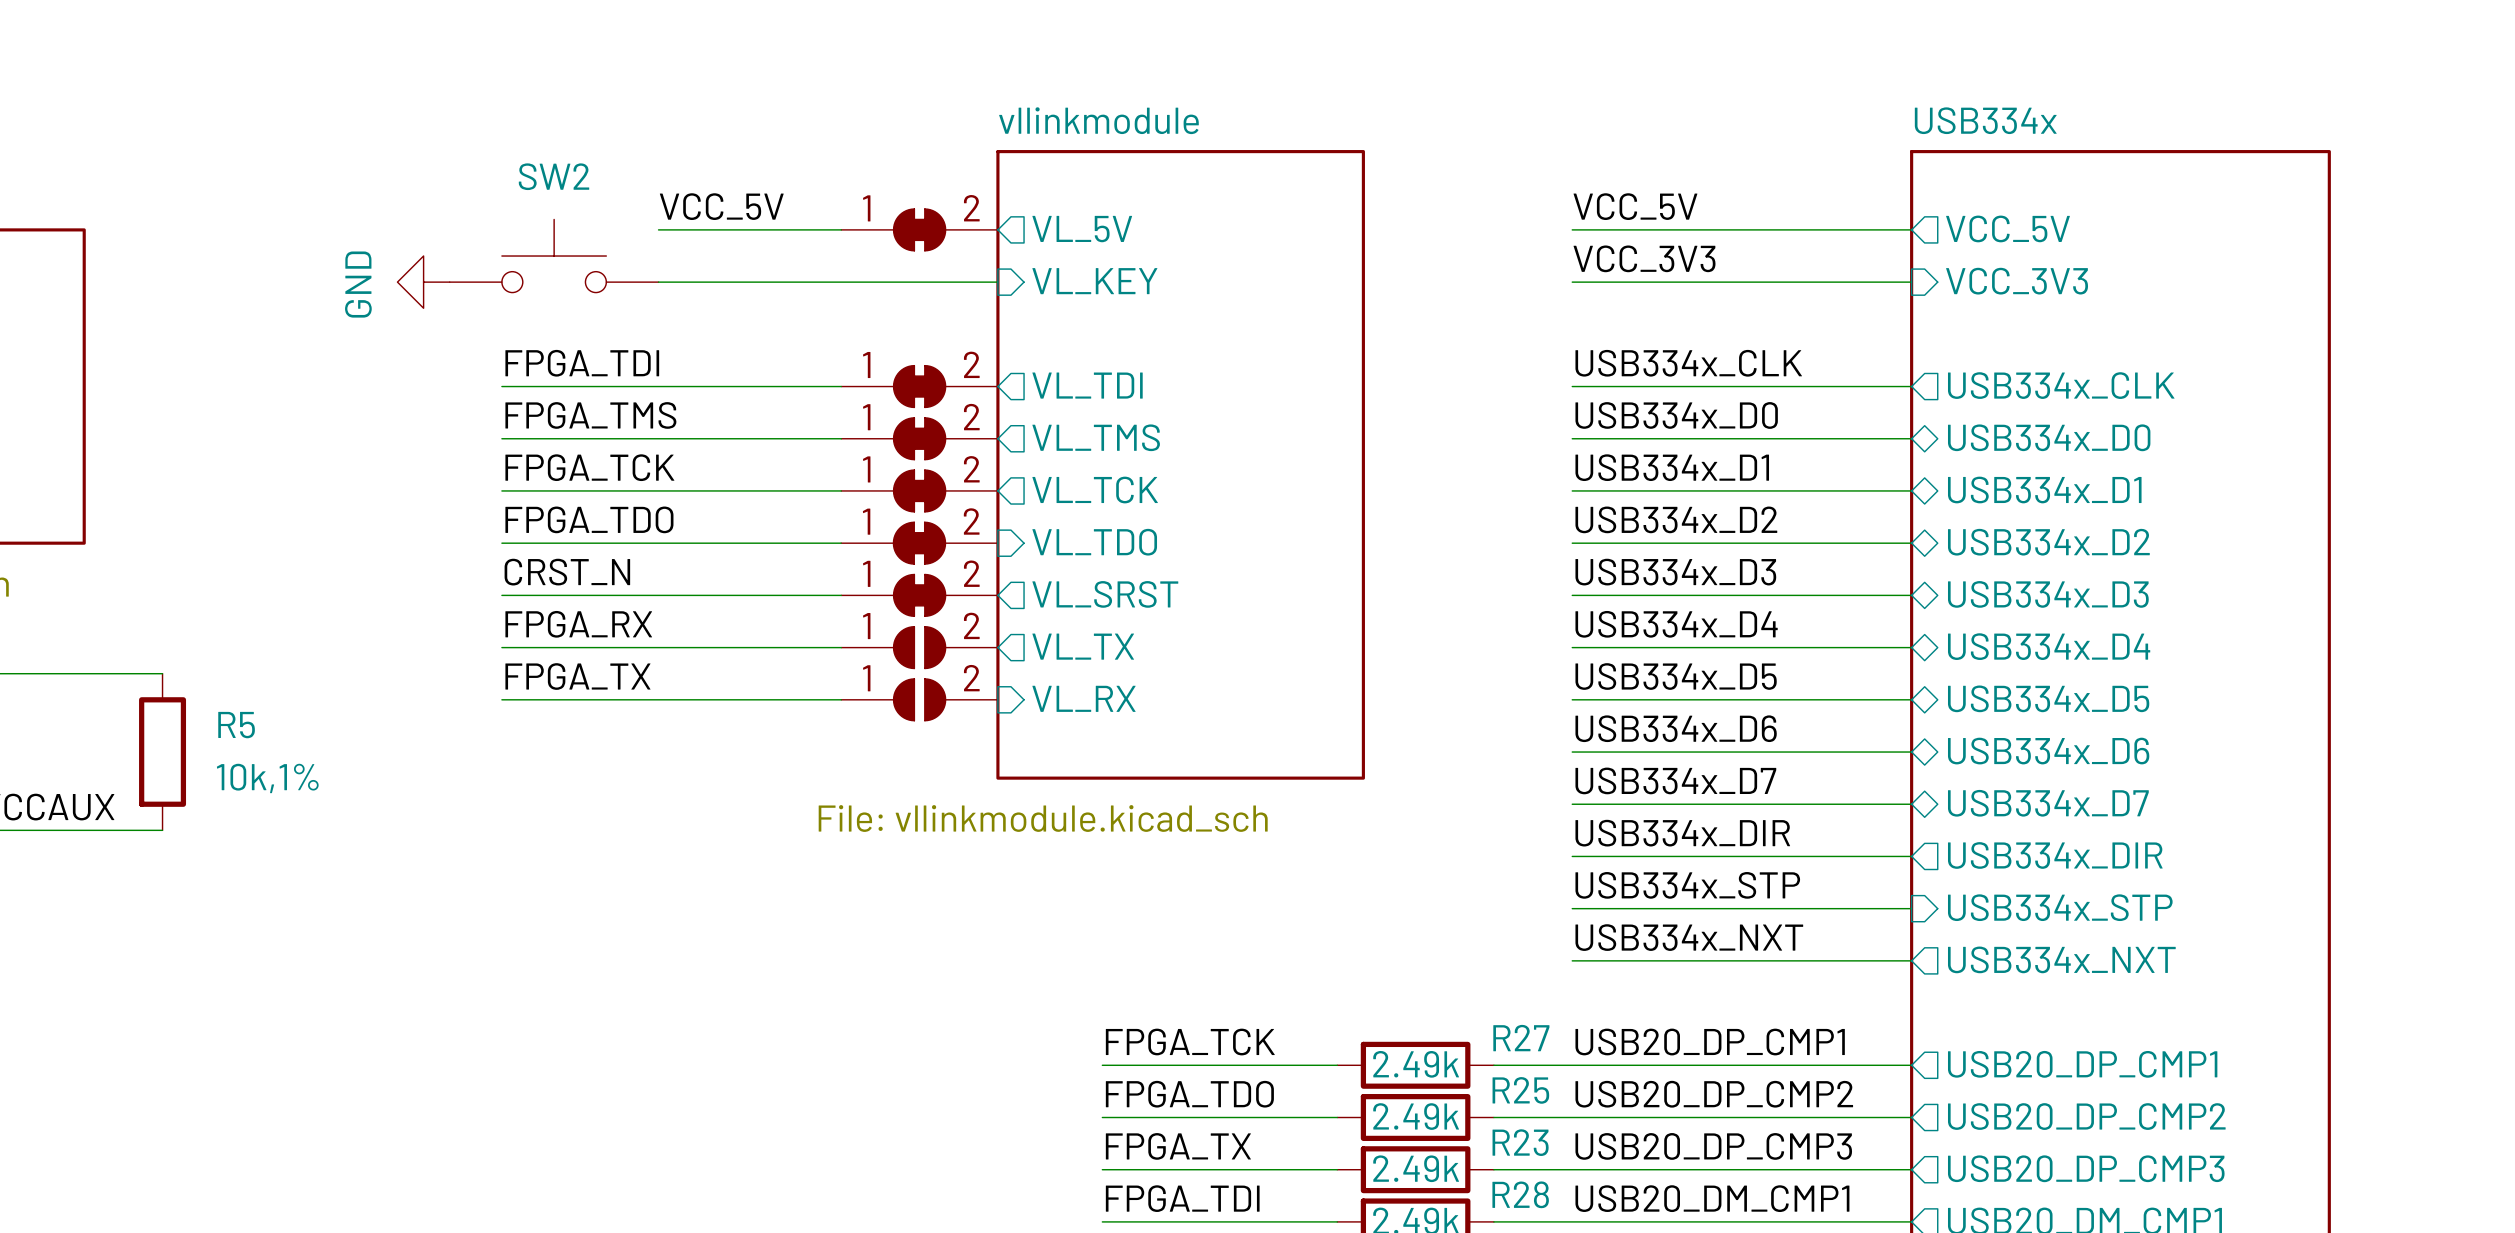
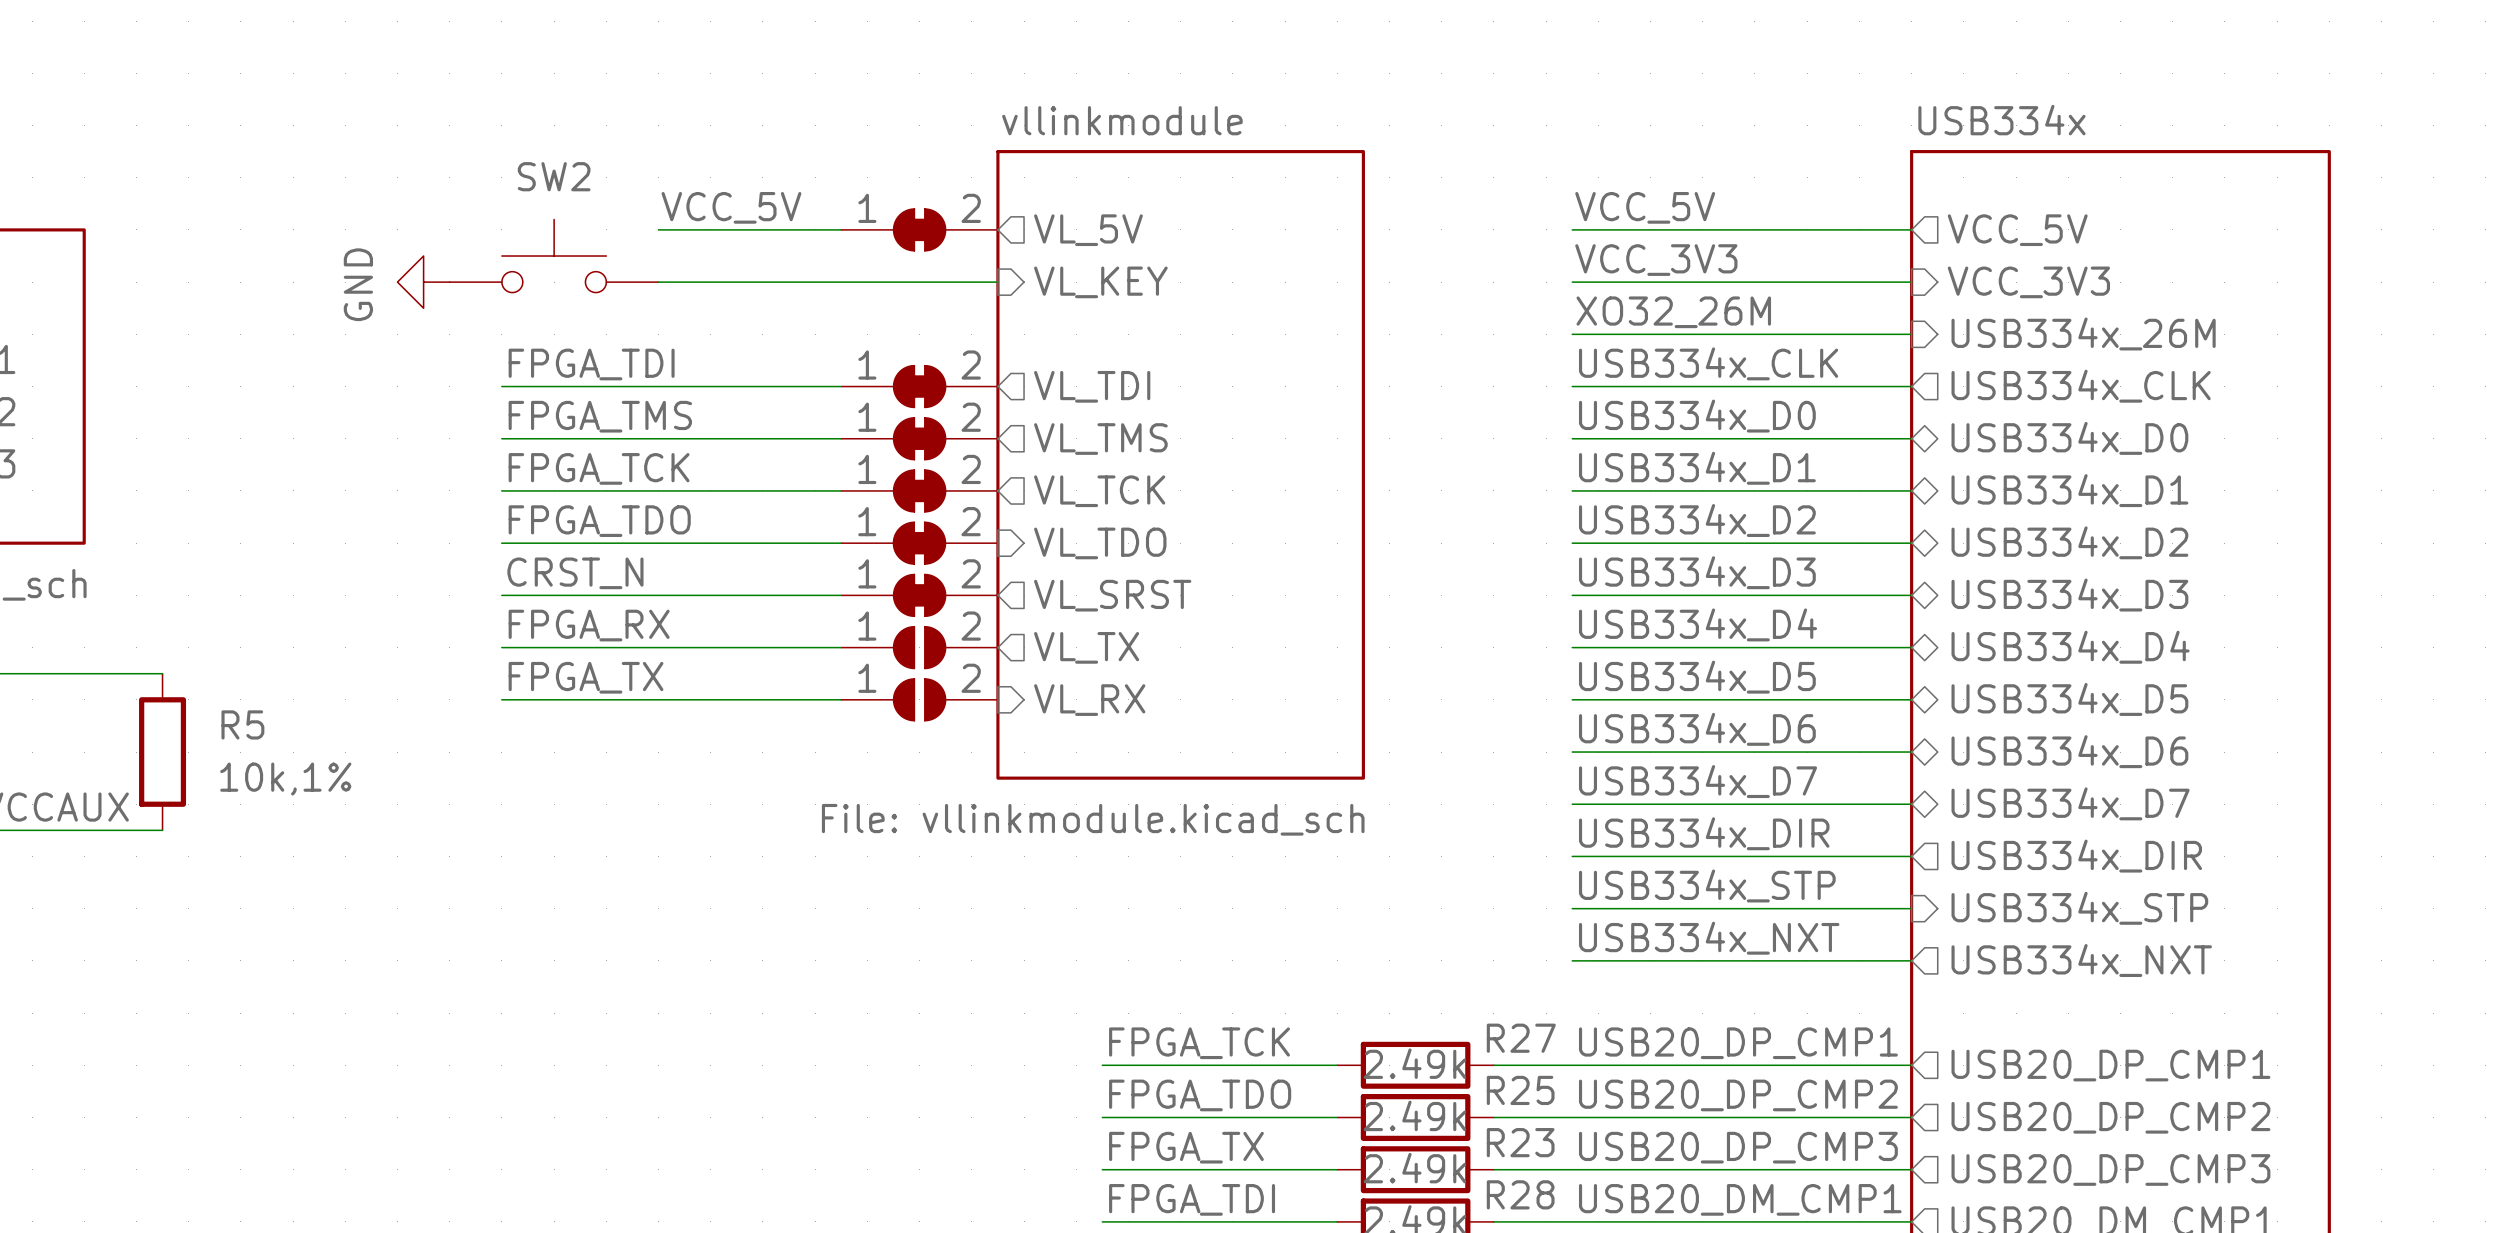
label: none -> XO32_26M (1673, 312)
sheet pin: none -> USB334x_26M (2083, 333)
wire: none -> (1572, 334) (1911, 334)

